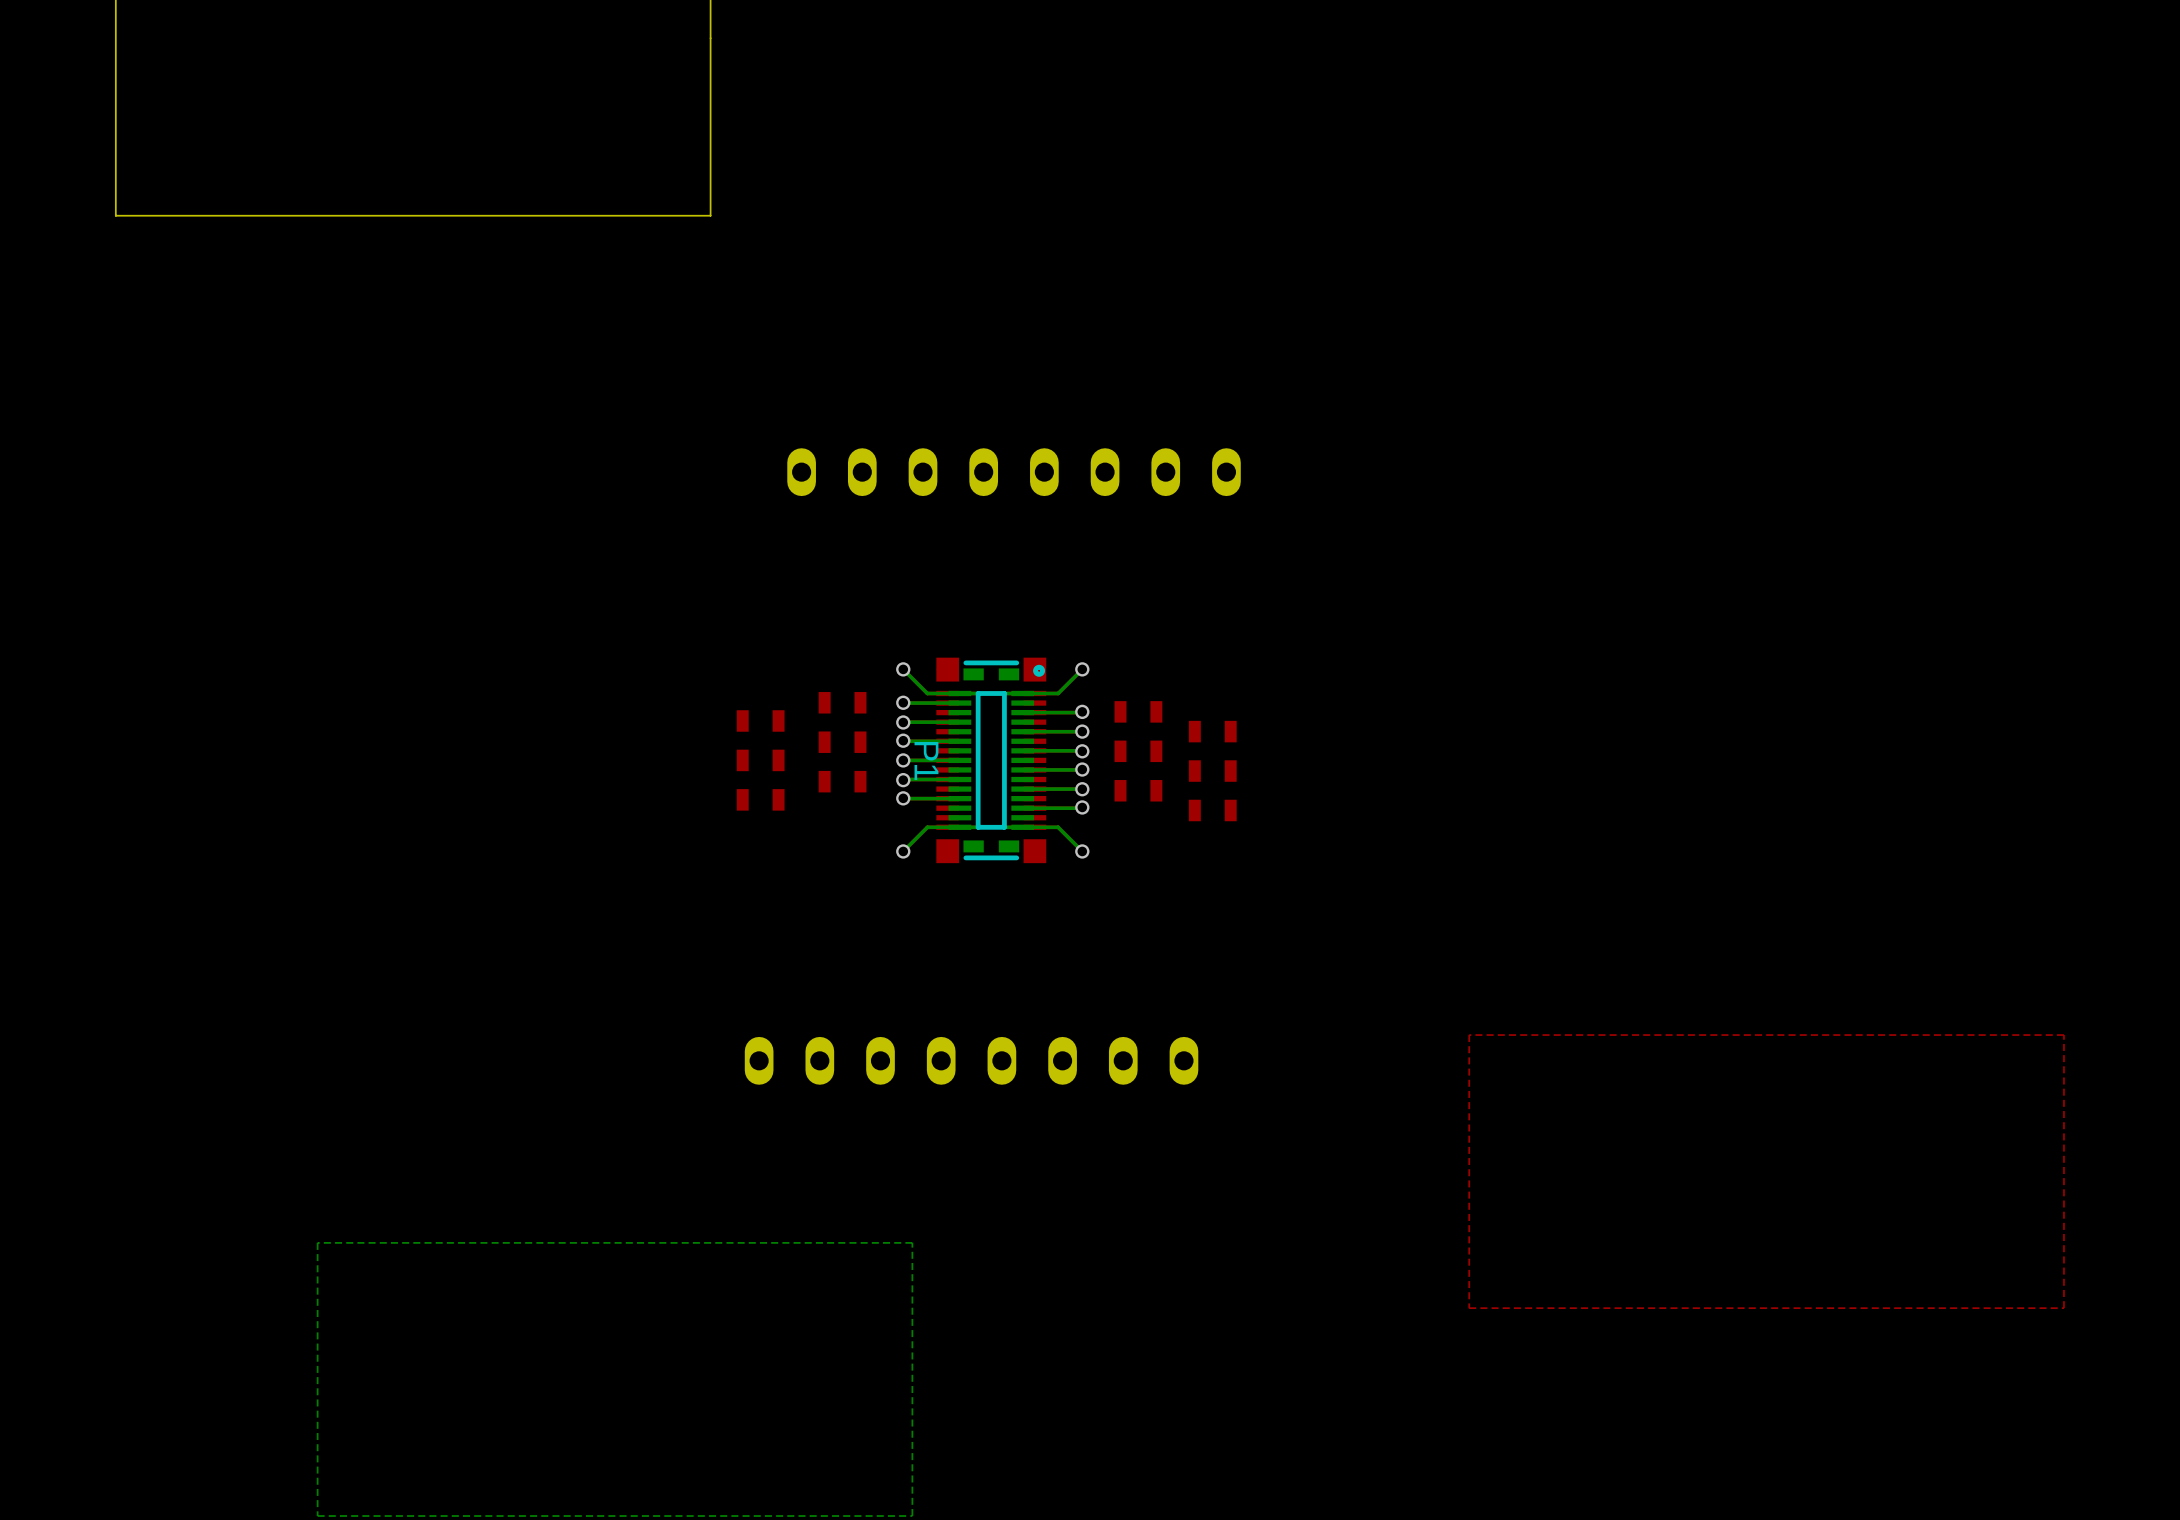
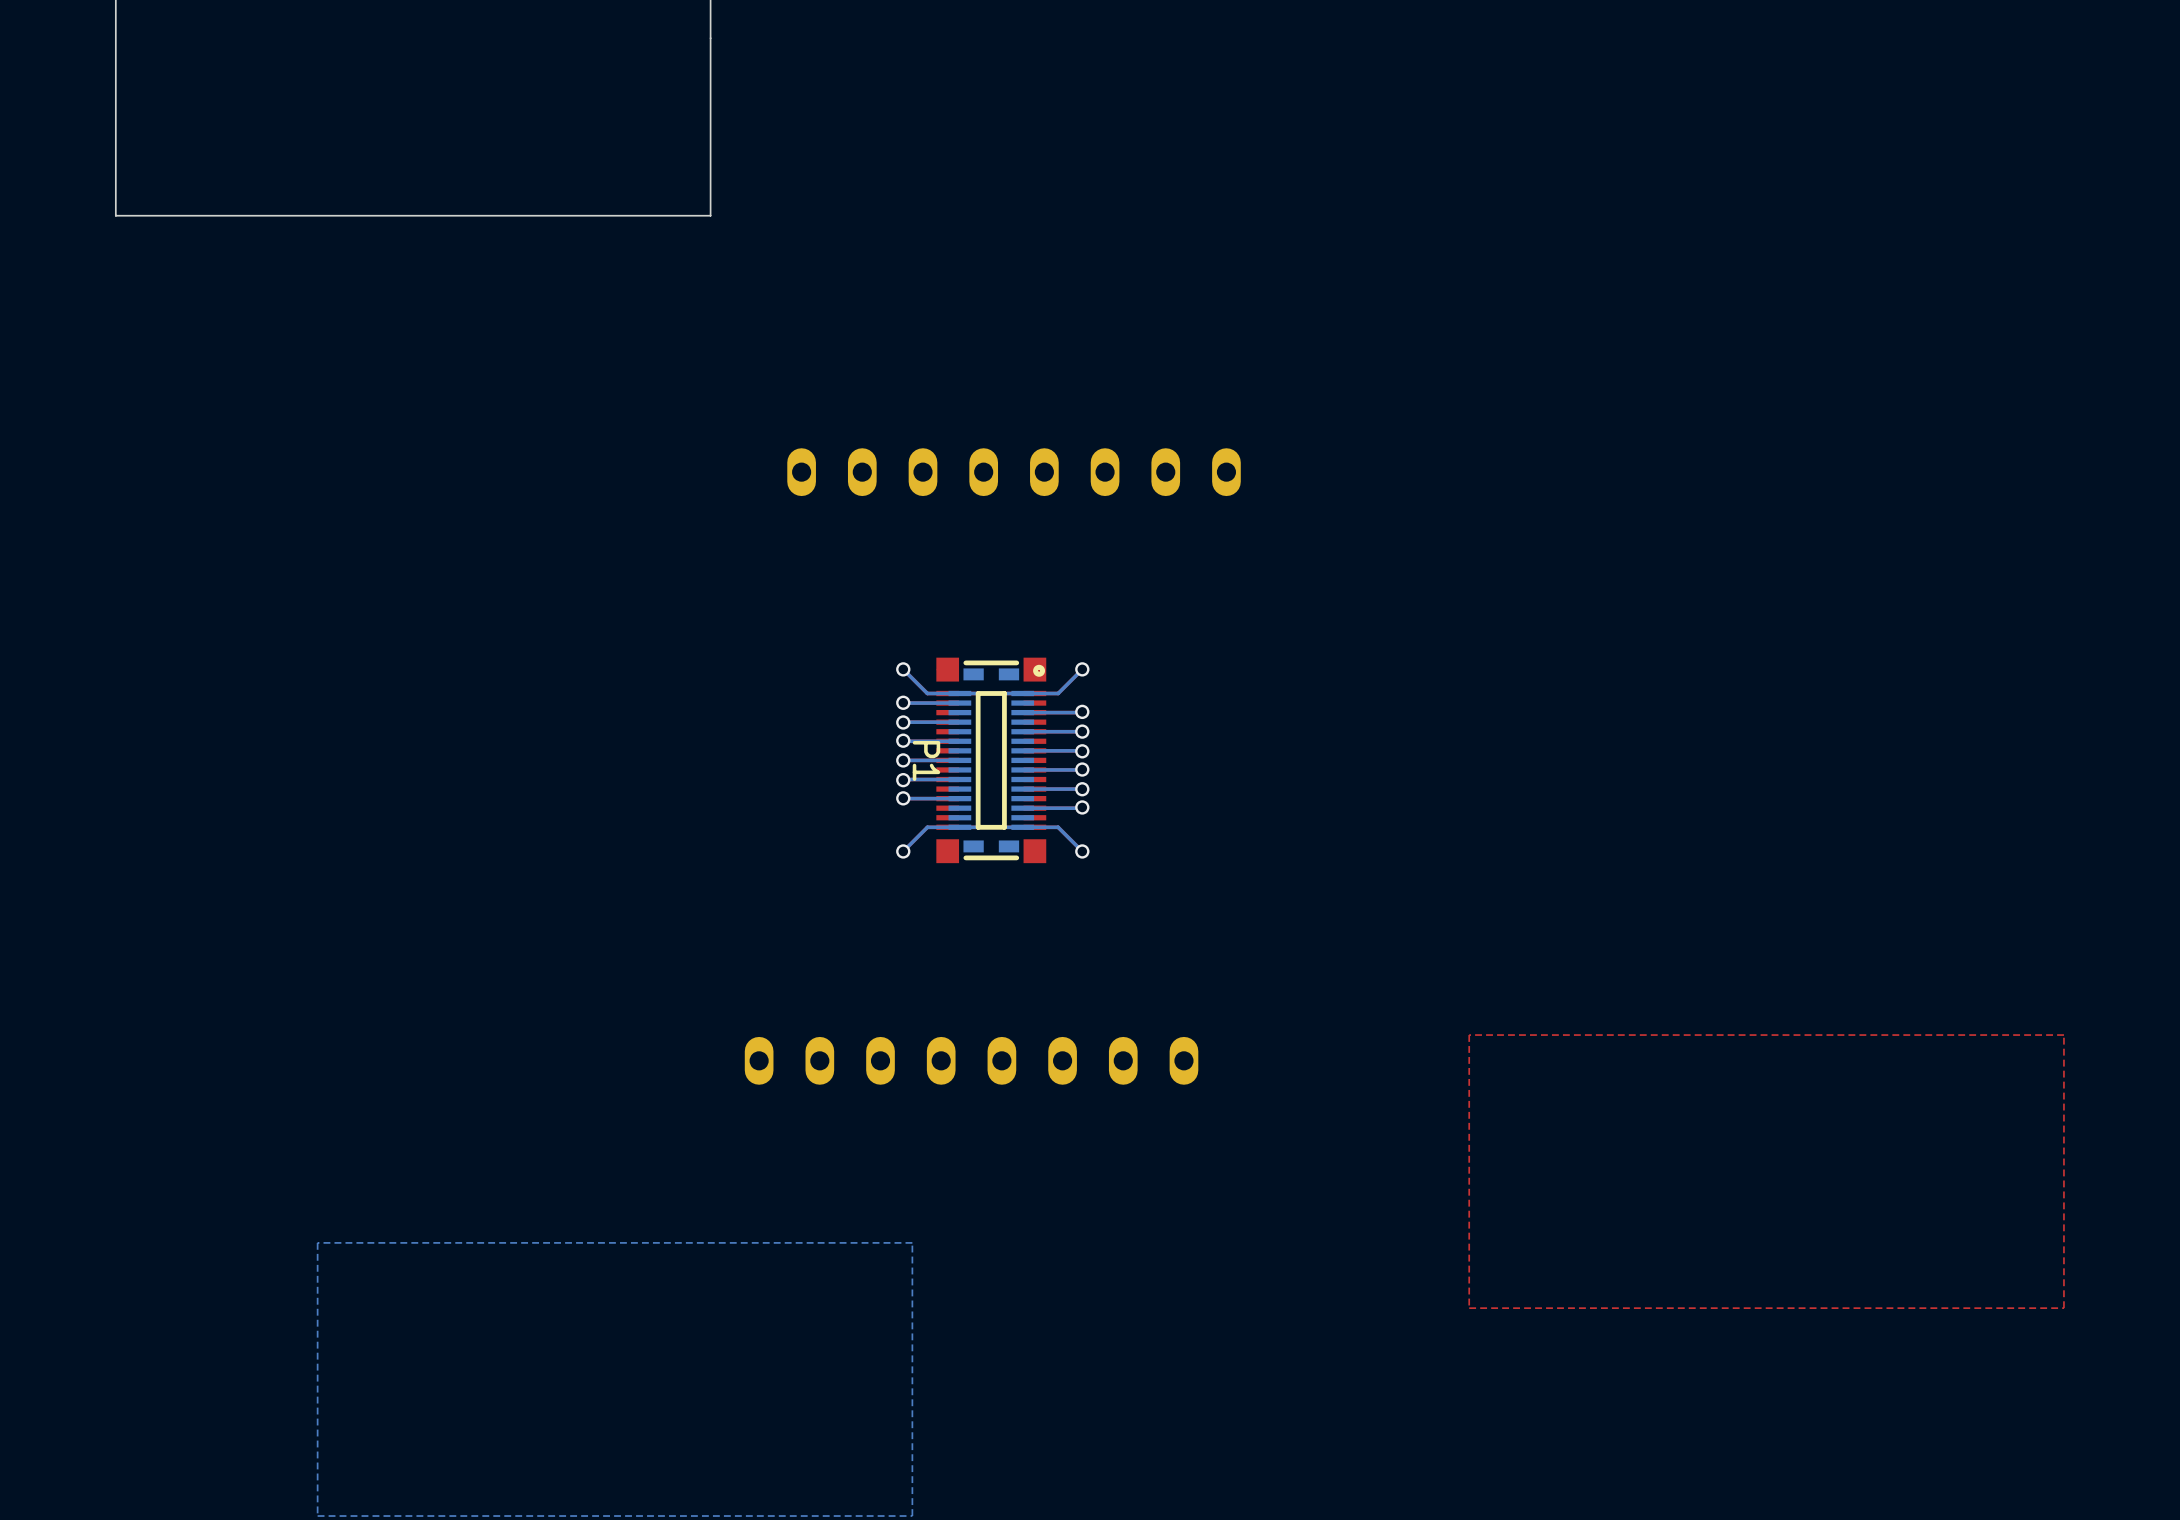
part: (842, 702) -> none
part: (1138, 711) -> none
part: (760, 720) -> none
part: (1212, 731) -> none
part: (842, 742) -> none
part: (1138, 751) -> none
part: (760, 760) -> none
part: (1212, 771) -> none
part: (842, 781) -> none
part: (1138, 790) -> none
part: (760, 799) -> none
part: (1212, 810) -> none

